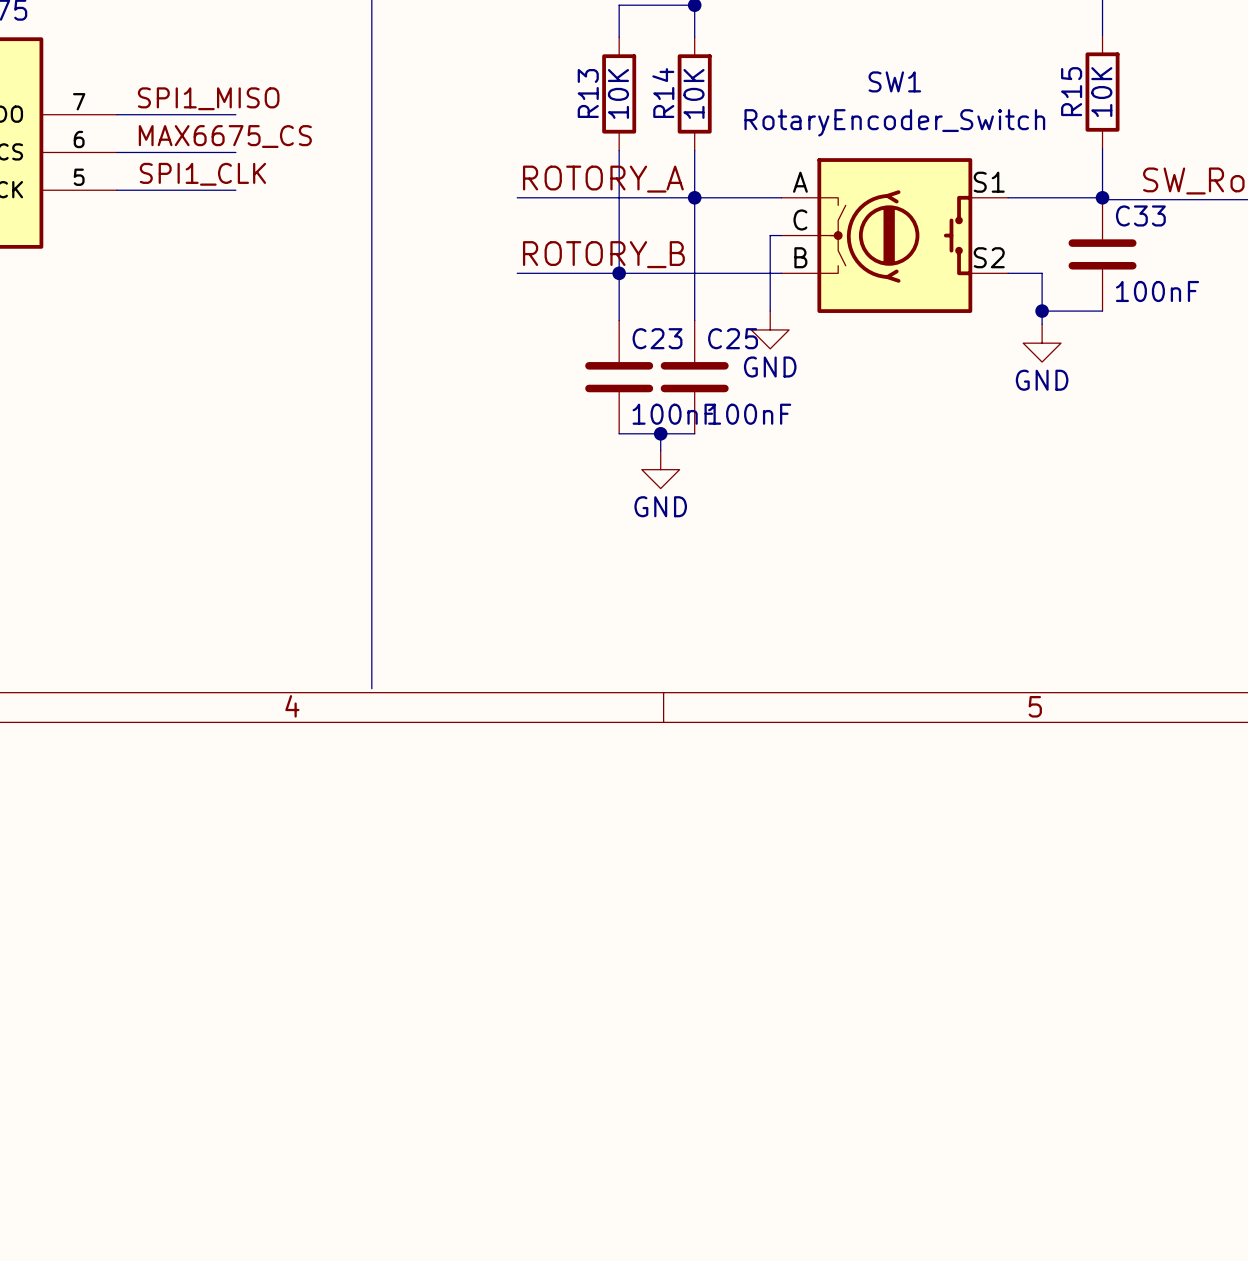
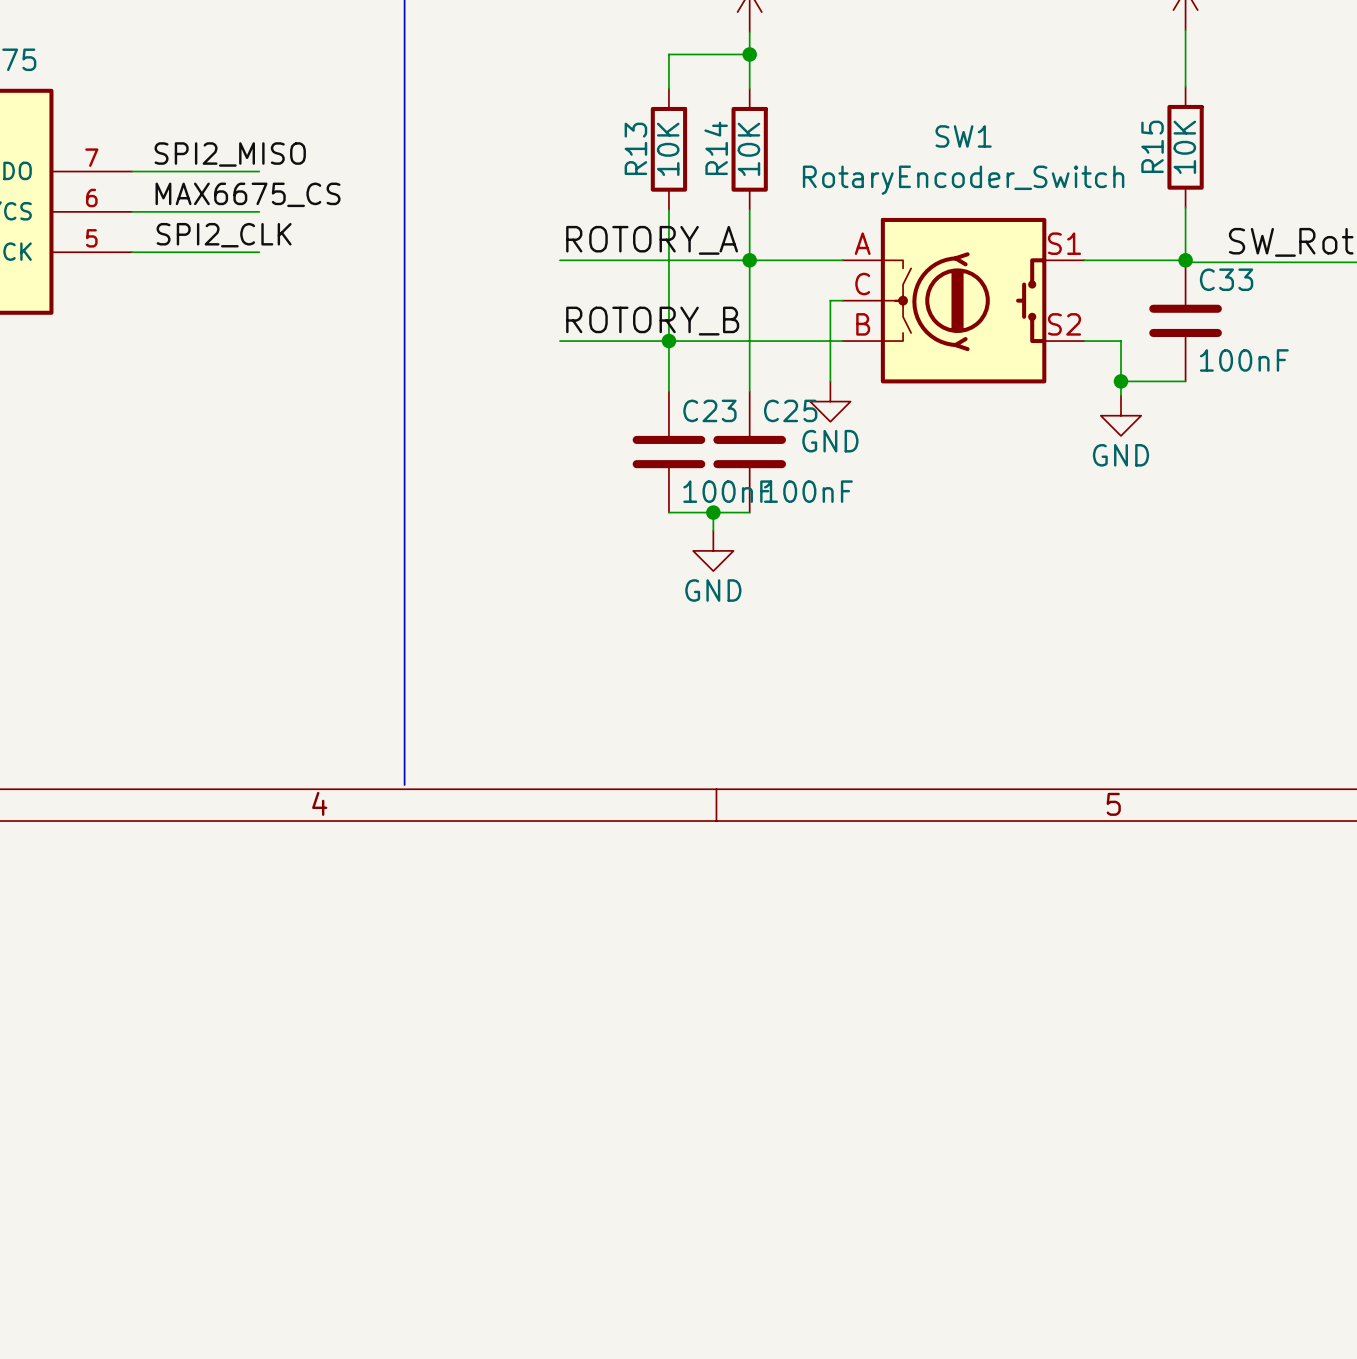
label: SPI1_MISO (208, 98) -> SPI2_MISO (230, 154)
label: SPI1_CLK (202, 174) -> SPI2_CLK (224, 235)

